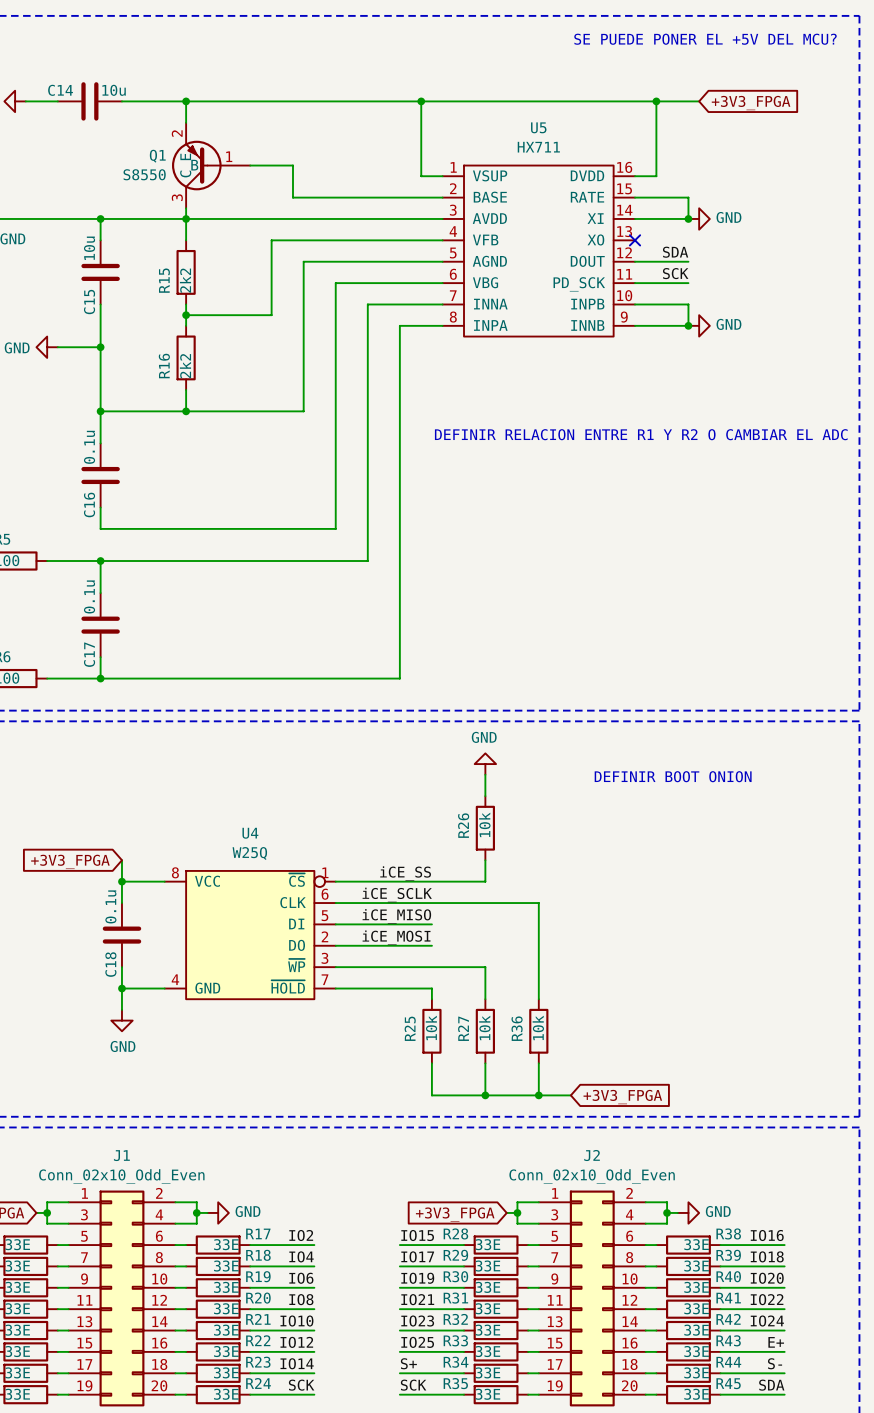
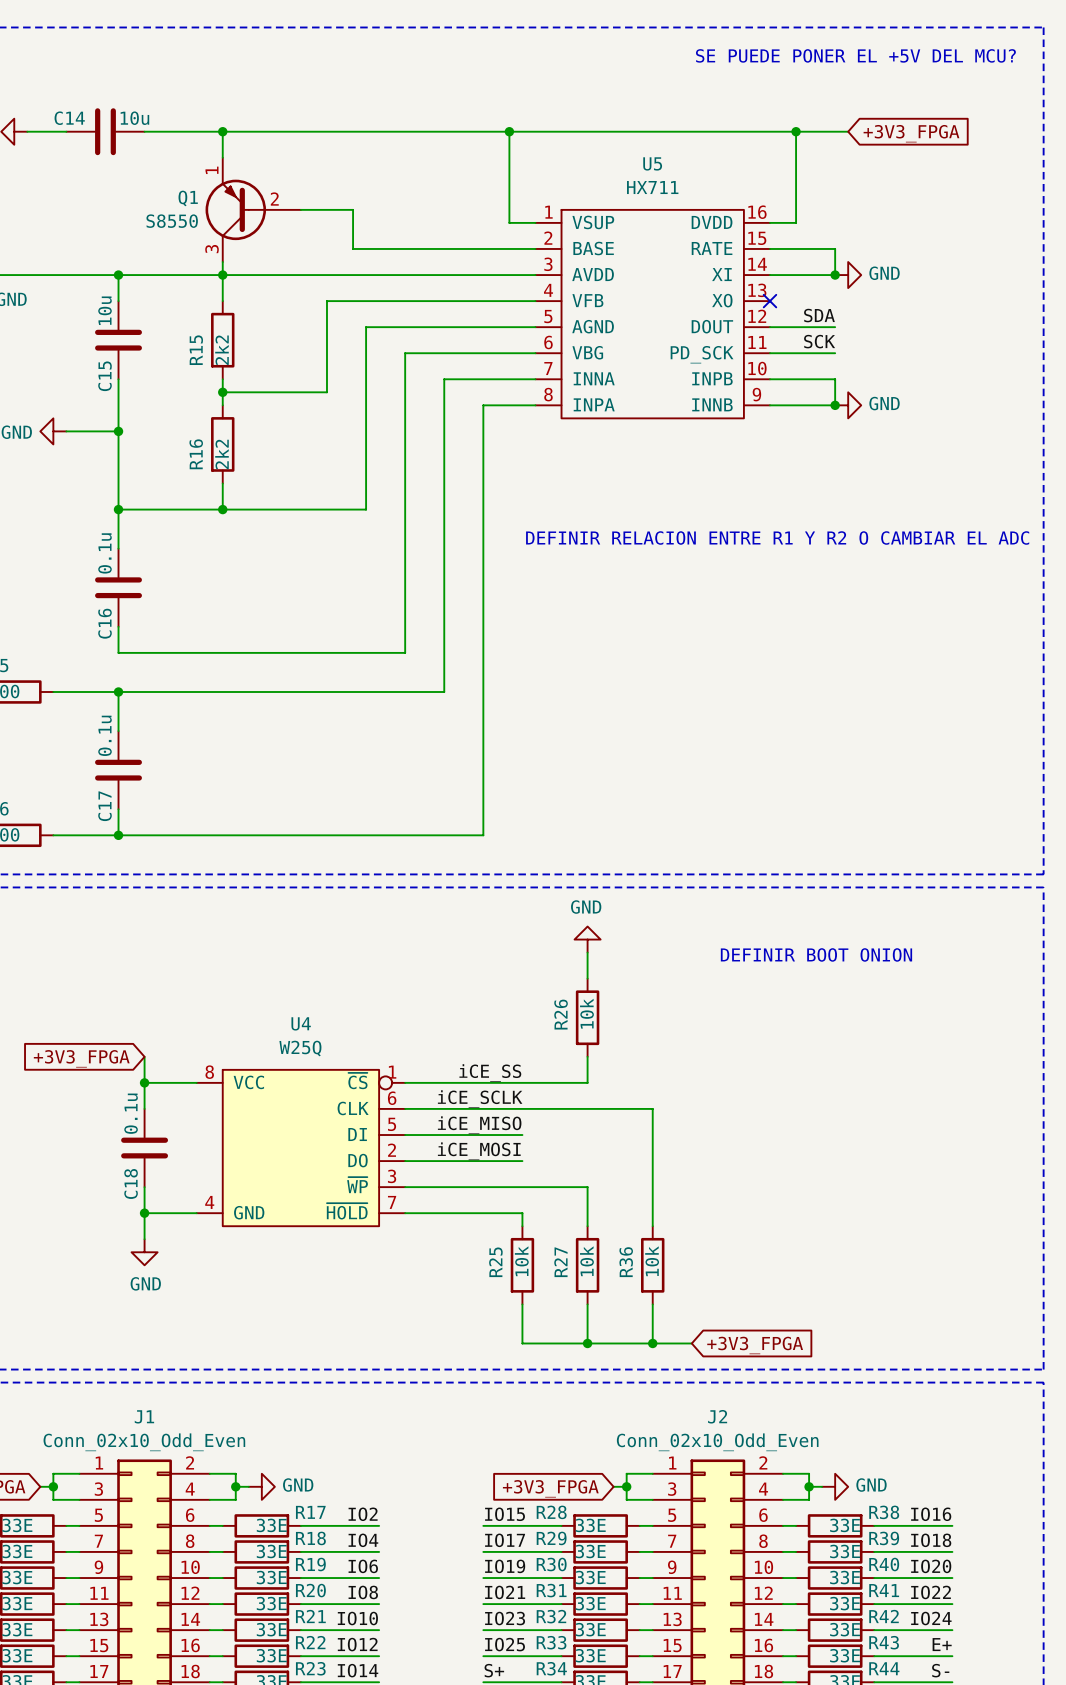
Q1 pin number: 2 (177, 133) -> 1 (212, 170)
Q1 pin name: E (185, 156) -> none
Q1 pin number: 1 (229, 156) -> 2 (274, 199)
Q1 pin name: B (194, 165) -> none
Q1 pin name: C (185, 174) -> none

